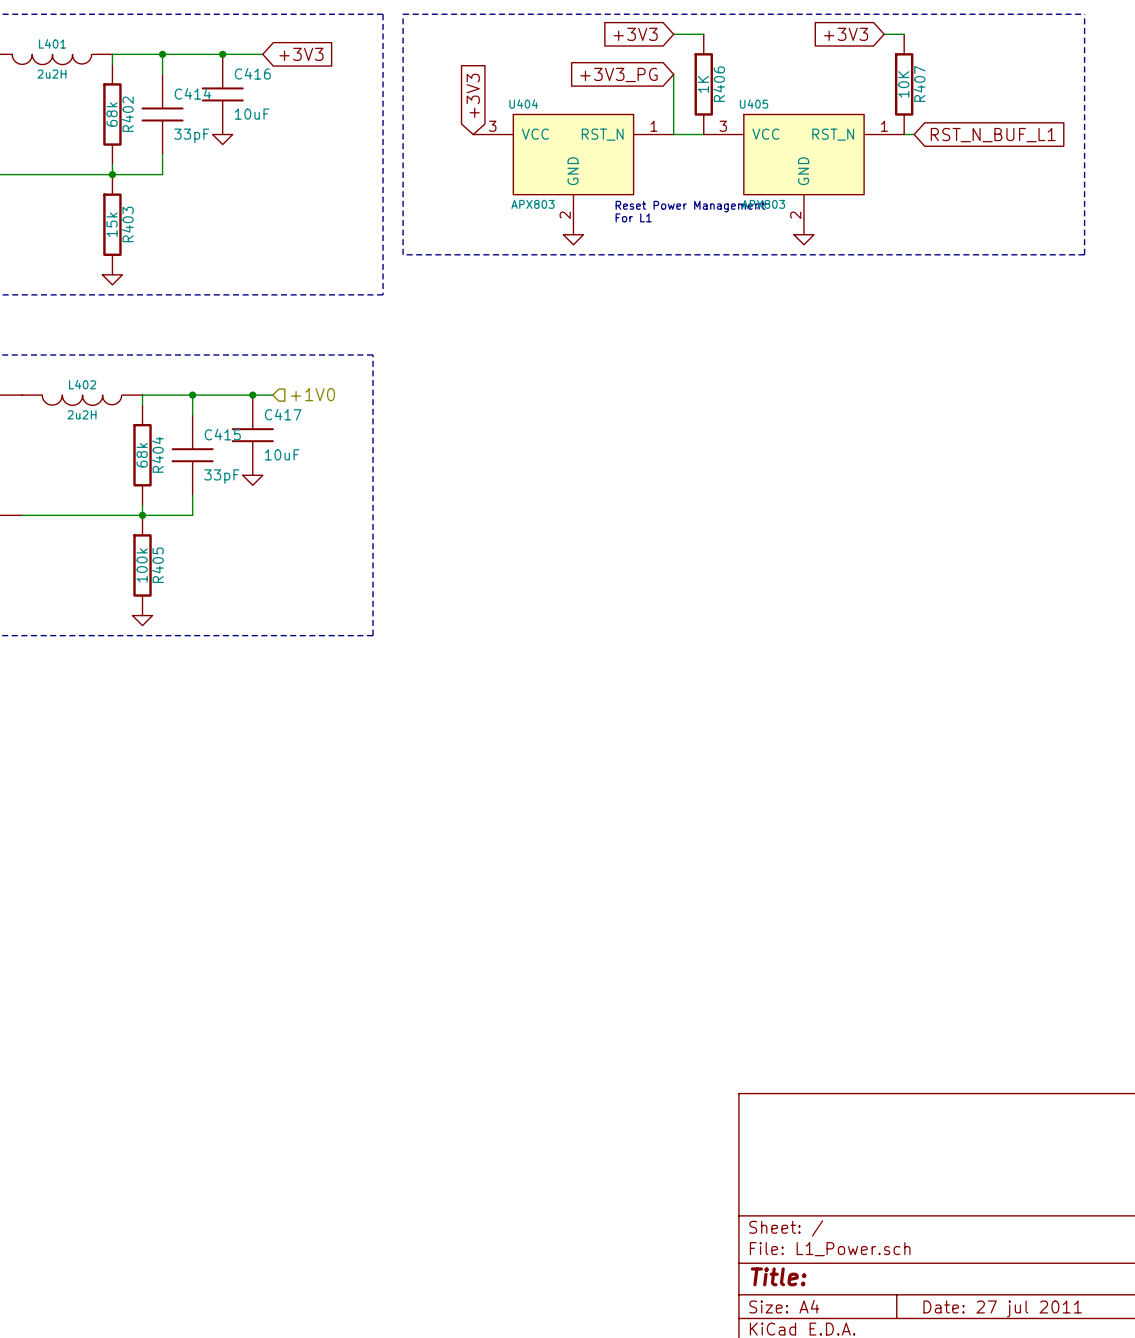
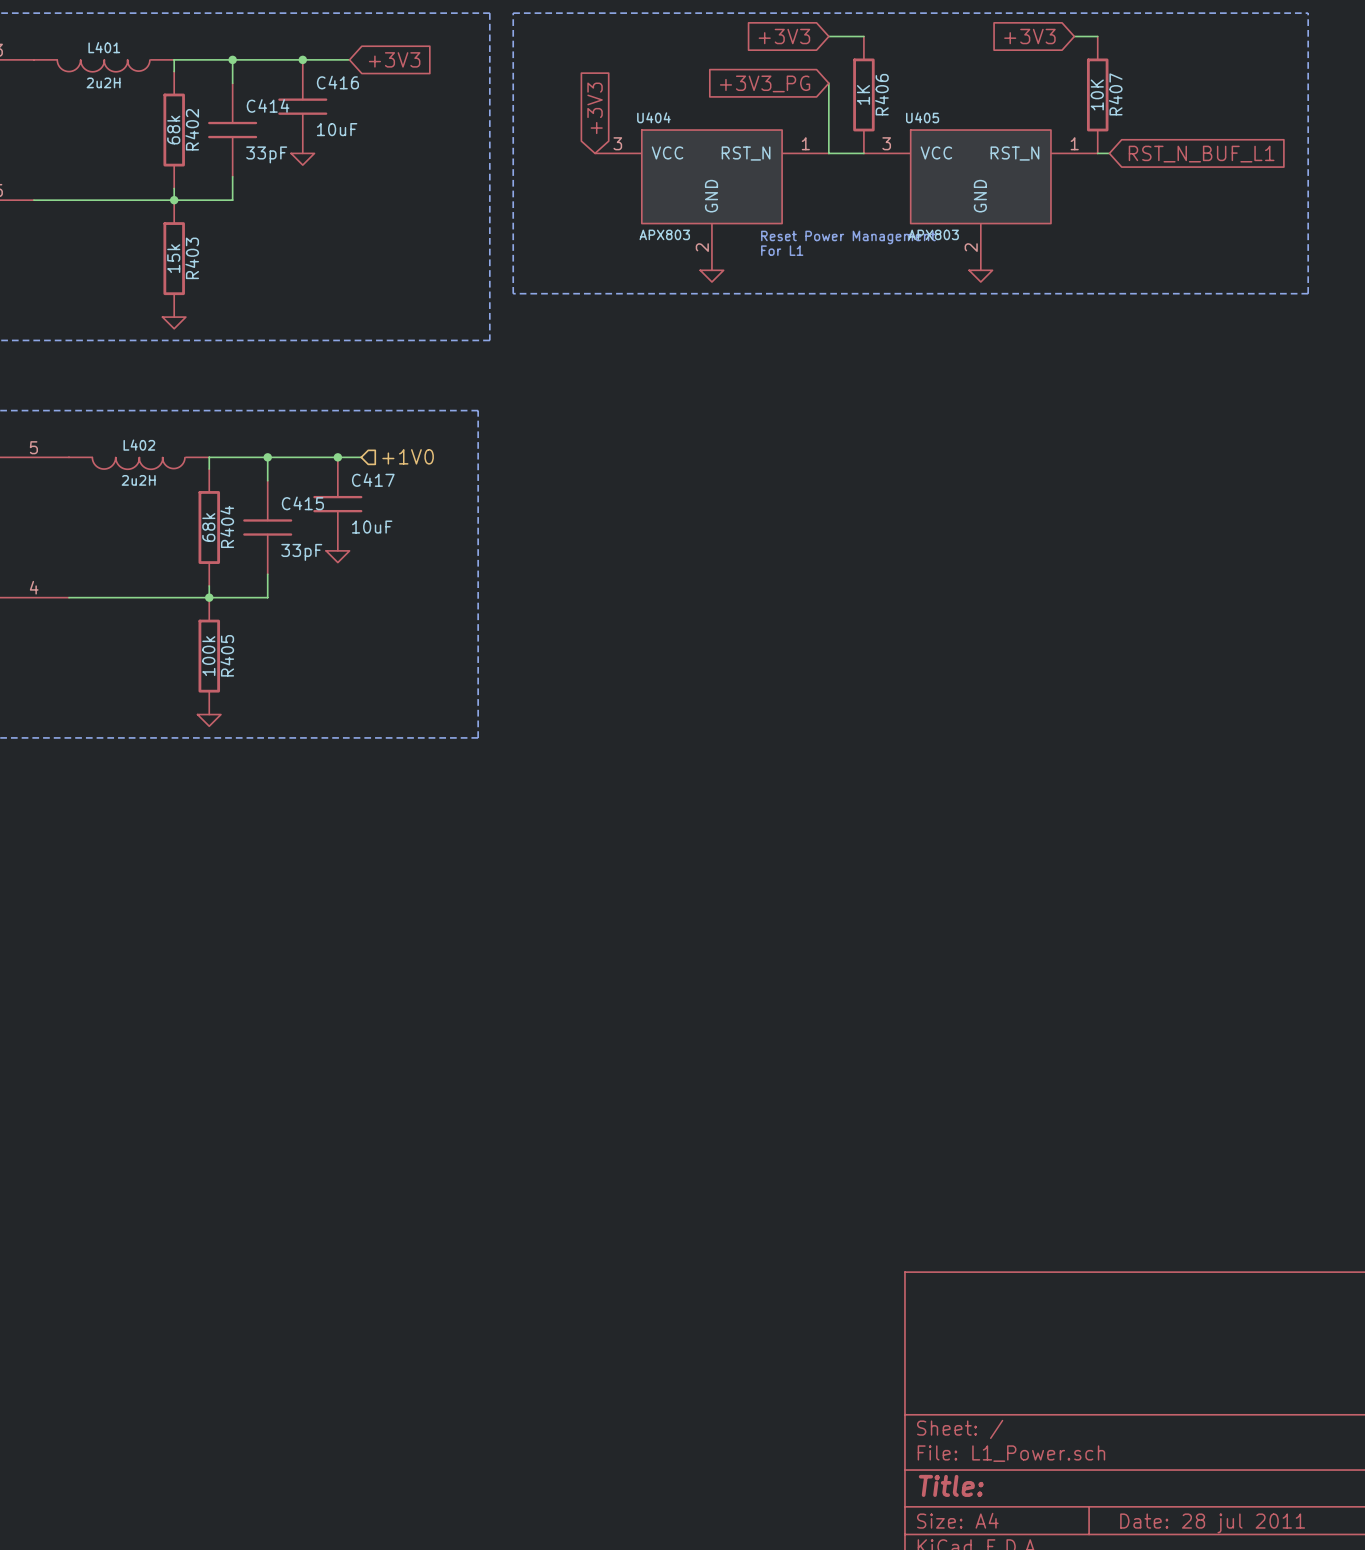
title block: Date: 27 jul 2011 (1002, 1308) -> Date: 28 jul 2011 (1212, 1523)

